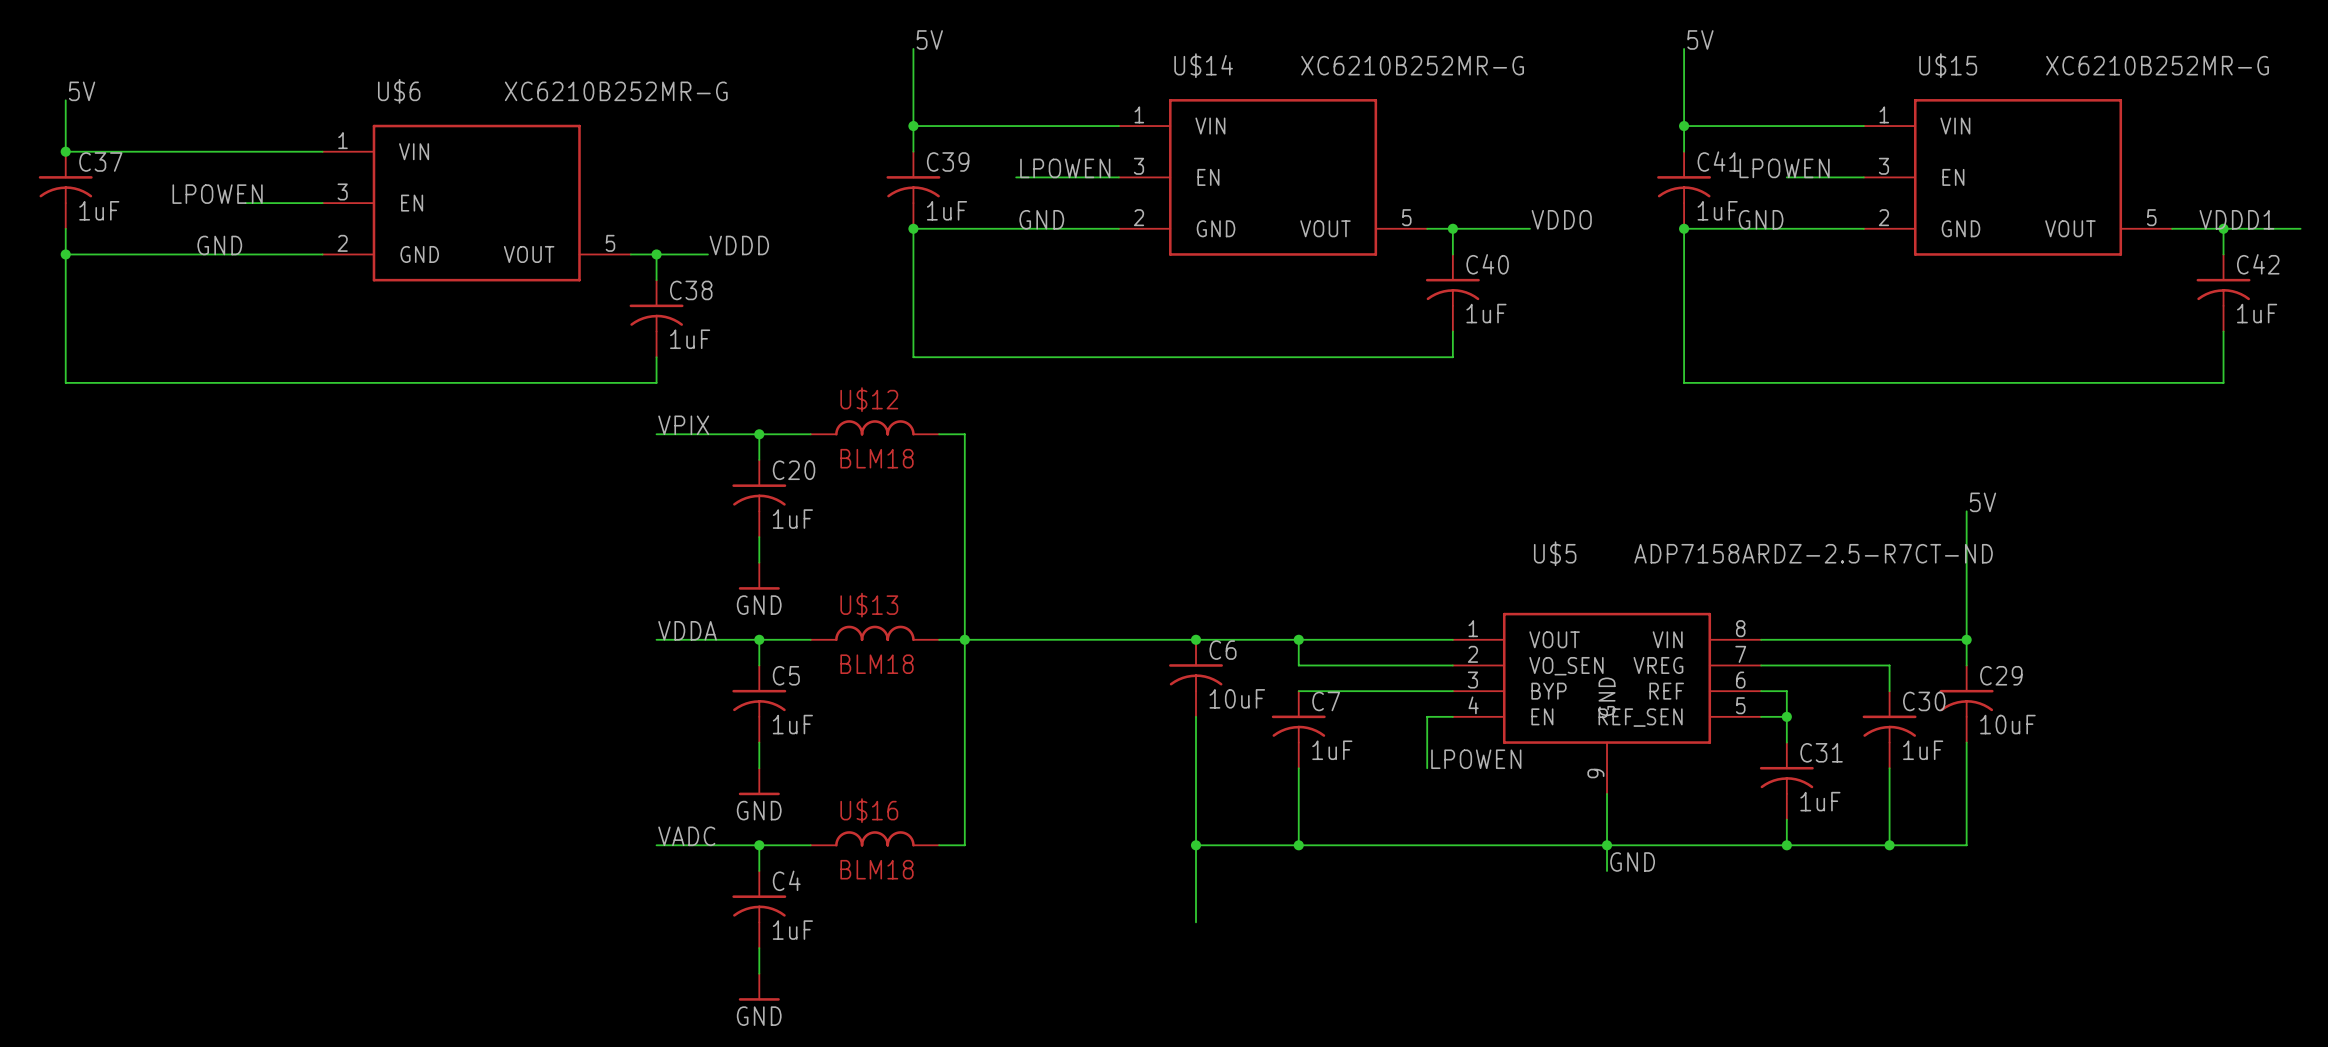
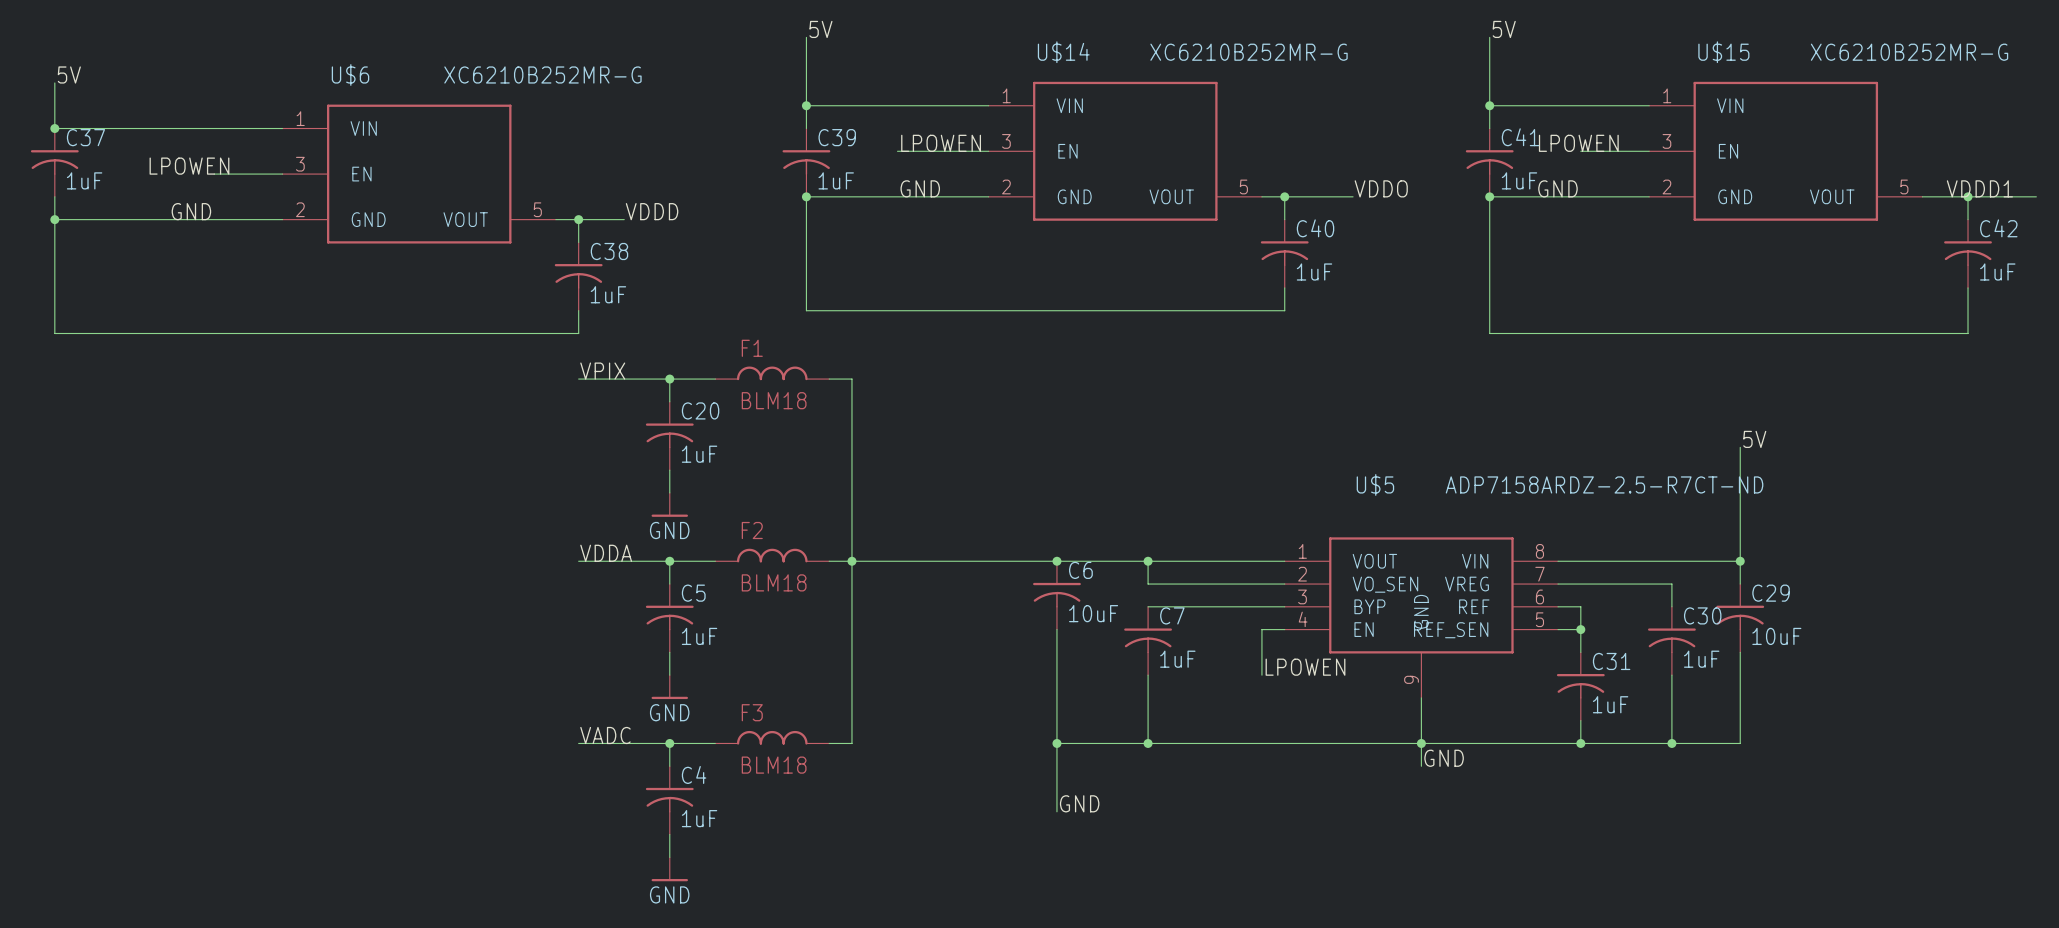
U$12 name: U$12 (869, 399) -> F1 (752, 348)
U$13 name: U$13 (869, 605) -> F2 (752, 530)
U$16 name: U$16 (869, 810) -> F3 (752, 712)
label: none -> GND (1079, 803)

